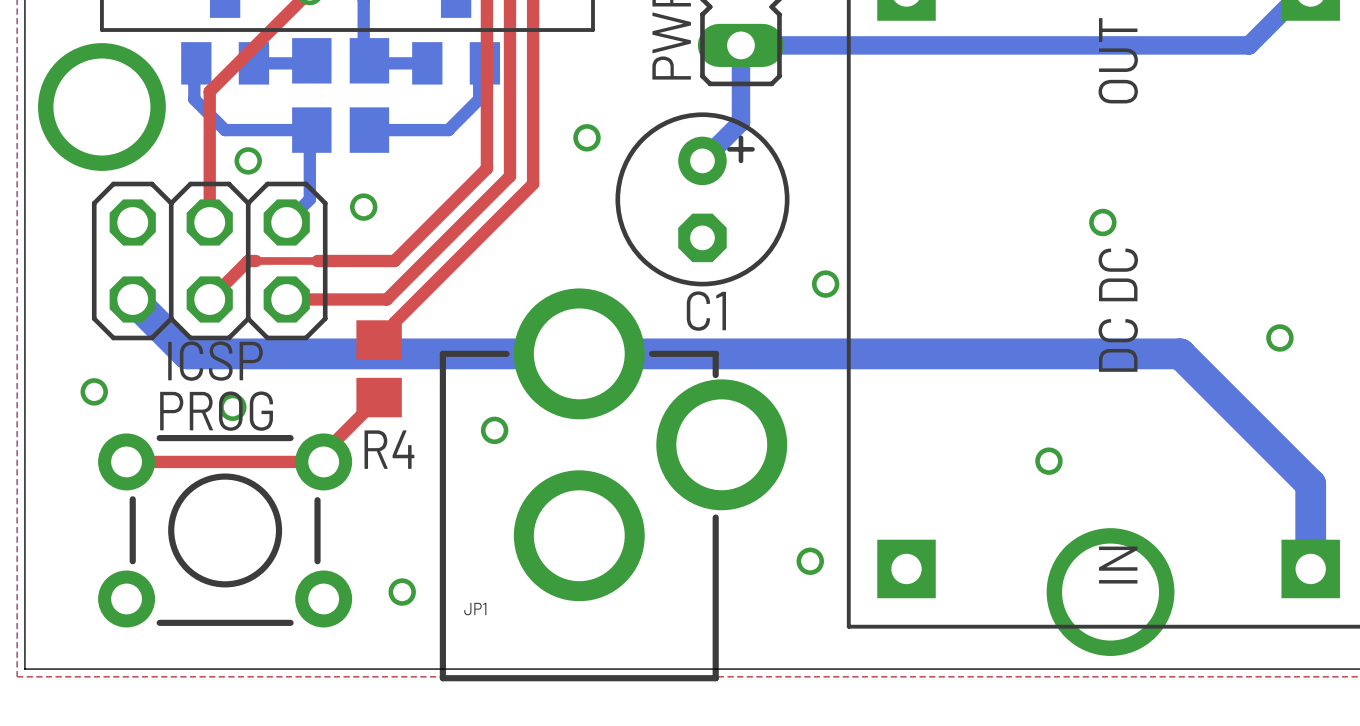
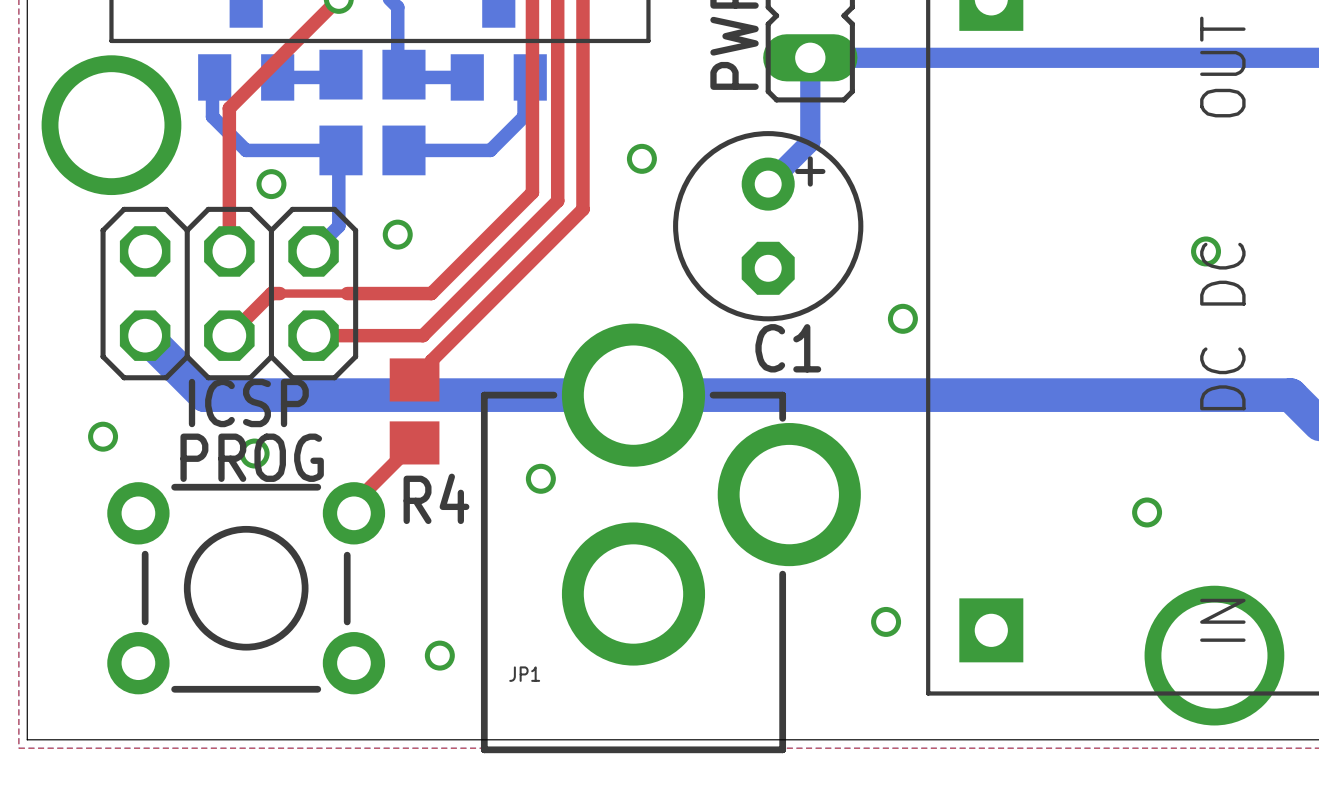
top track: (126, 461) (323, 461) -> none

